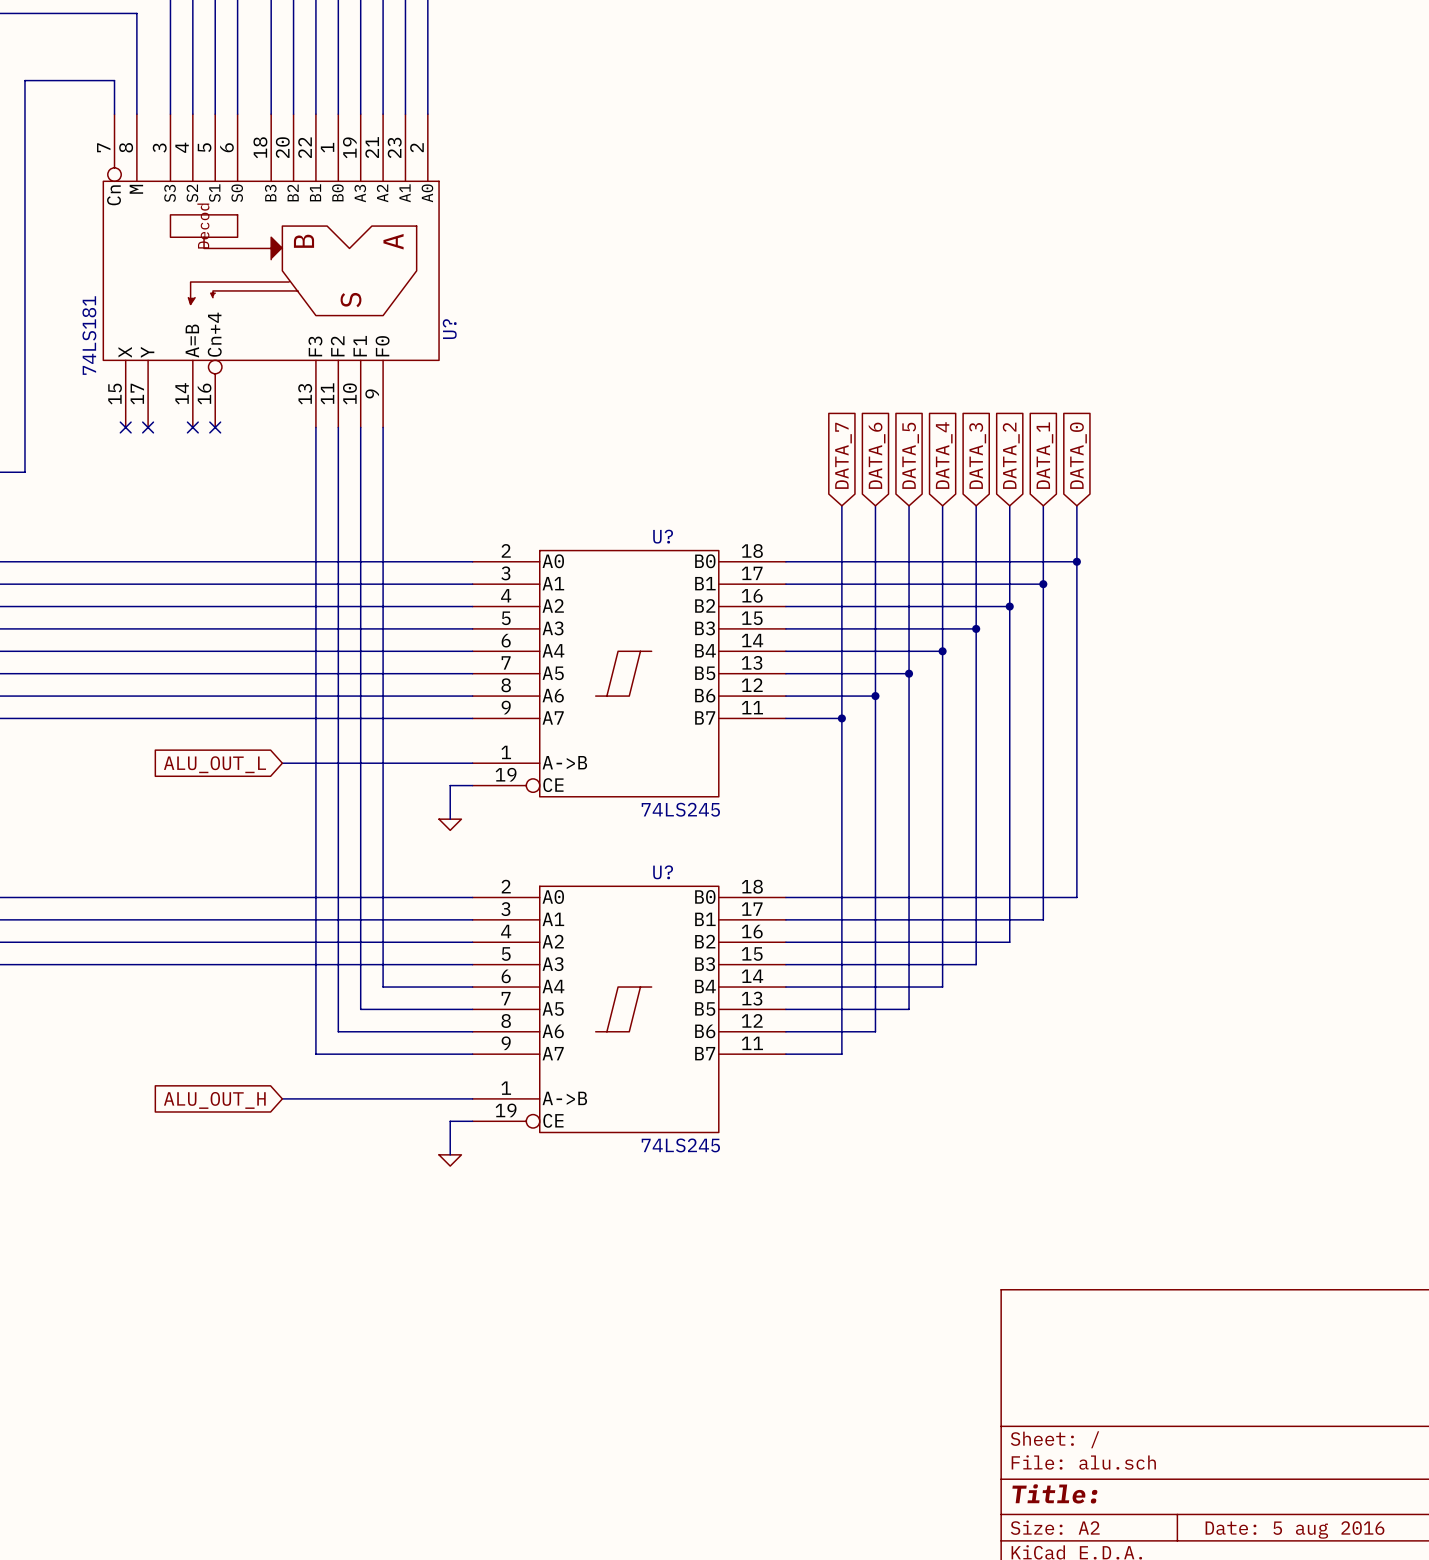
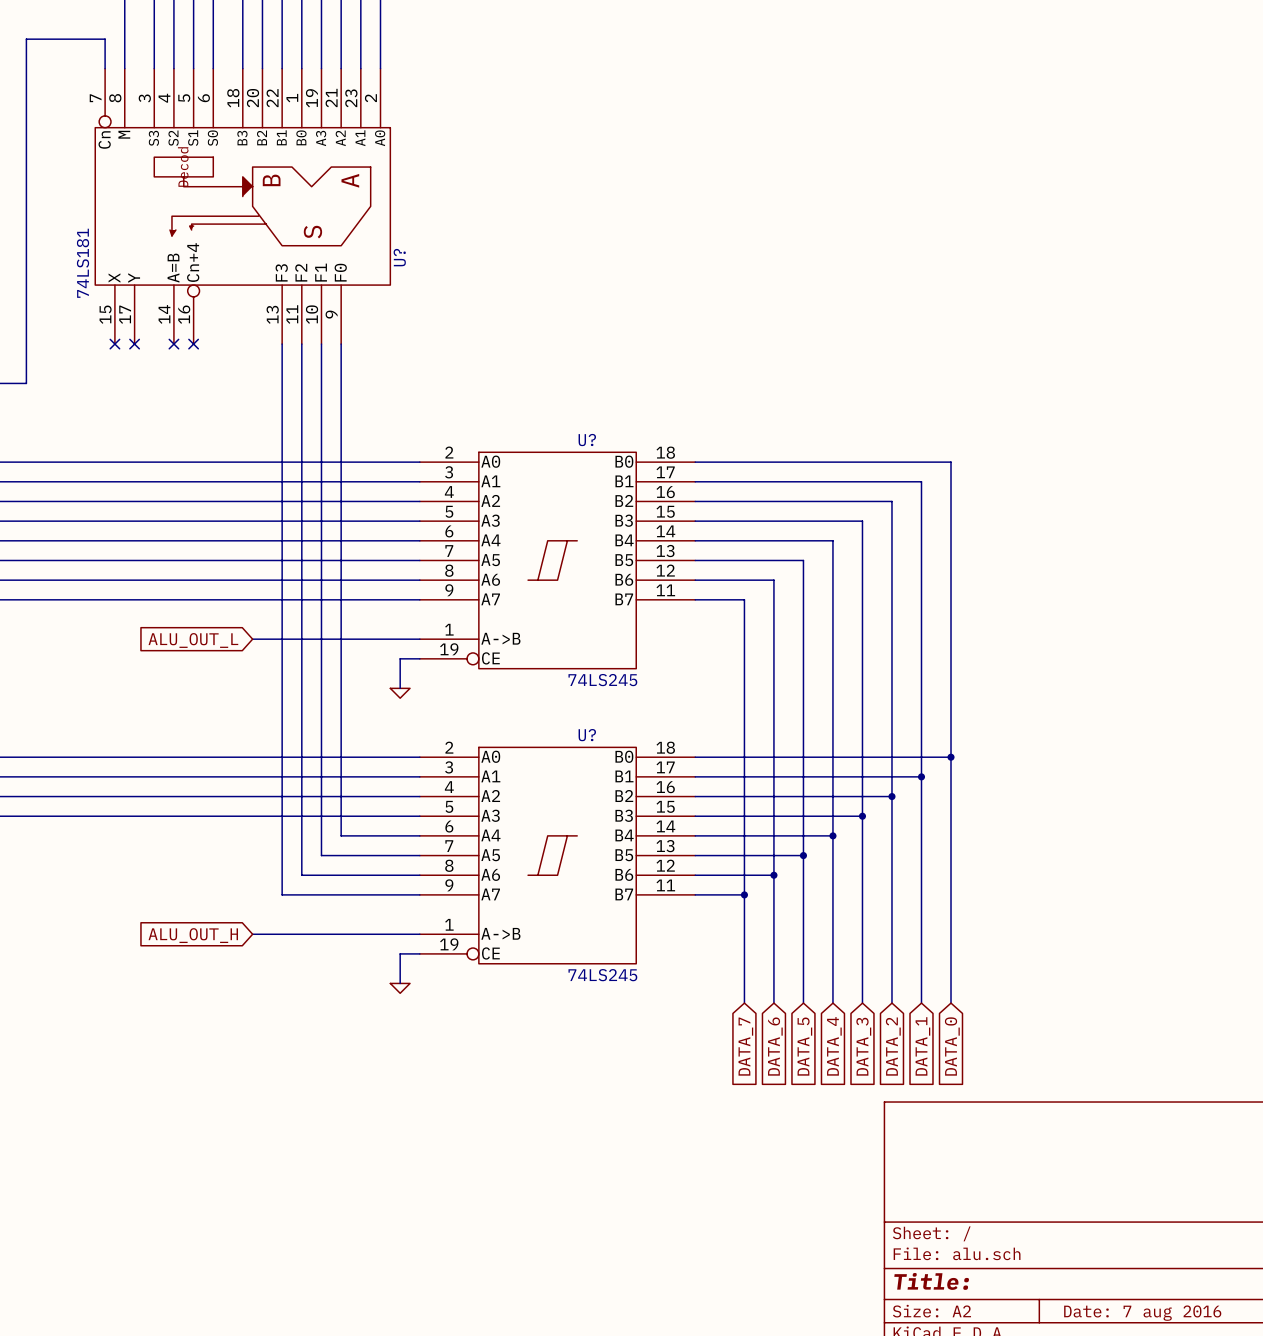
global label: DATA_7 (843, 455) -> none
global label: DATA_6 (877, 455) -> none
global label: DATA_5 (910, 455) -> none
global label: DATA_4 (944, 455) -> none
global label: DATA_3 (977, 455) -> none
global label: DATA_2 (1011, 455) -> none
global label: DATA_1 (1044, 455) -> none
global label: DATA_0 (1078, 455) -> none
wire: (841, 505) (841, 718) -> none
wire: (875, 505) (875, 696) -> none
wire: (909, 505) (909, 673) -> none
wire: (942, 505) (942, 651) -> none
wire: (976, 505) (976, 628) -> none
wire: (1009, 505) (1009, 606) -> none
wire: (1043, 505) (1043, 584) -> none
wire: (1076, 505) (1076, 561) -> none
junction: (1076, 561) -> none
junction: (1043, 584) -> none
junction: (1009, 606) -> none
junction: (976, 628) -> none
junction: (942, 651) -> none
junction: (909, 673) -> none
junction: (875, 696) -> none
junction: (841, 718) -> none
wire: none -> (951, 757) (951, 1003)
junction: none -> (951, 757)
wire: none -> (921, 776) (921, 1003)
junction: none -> (921, 776)
wire: none -> (891, 796) (891, 1003)
junction: none -> (891, 796)
wire: none -> (862, 816) (862, 1003)
junction: none -> (862, 816)
wire: none -> (832, 835) (832, 1003)
junction: none -> (832, 835)
wire: none -> (803, 855) (803, 1003)
junction: none -> (803, 855)
wire: none -> (773, 875) (773, 1003)
junction: none -> (773, 875)
wire: none -> (744, 894) (744, 1003)
junction: none -> (744, 894)
global label: none -> DATA_7 (745, 1046)
global label: none -> DATA_6 (775, 1046)
global label: none -> DATA_5 (804, 1046)
global label: none -> DATA_4 (834, 1046)
global label: none -> DATA_3 (863, 1046)
global label: none -> DATA_2 (893, 1046)
global label: none -> DATA_1 (922, 1046)
global label: none -> DATA_0 (952, 1046)
title block: Date: 5 aug 2016 (1295, 1529) -> Date: 7 aug 2016 (1142, 1313)

